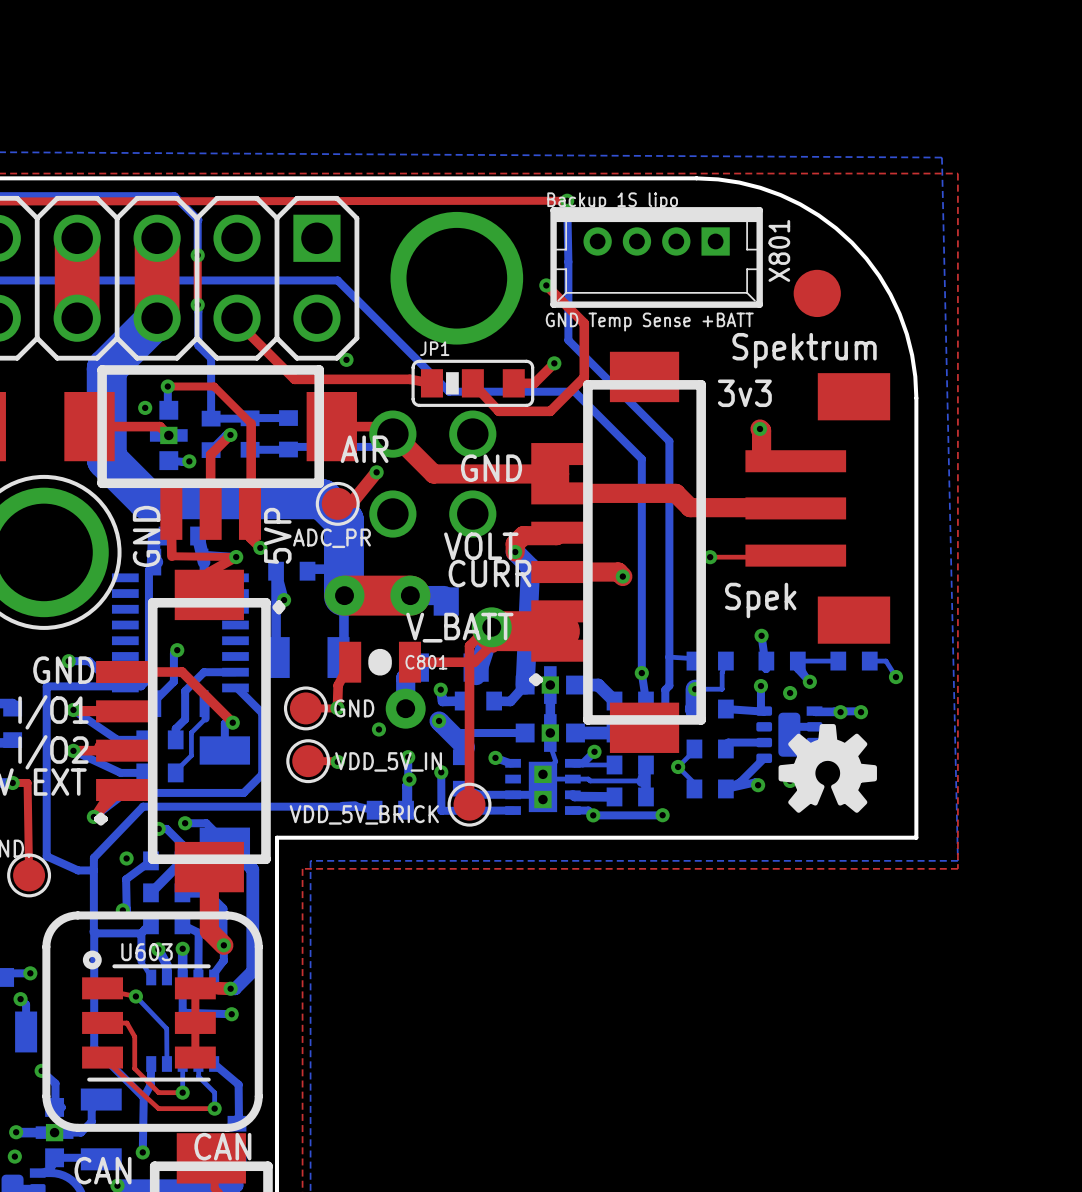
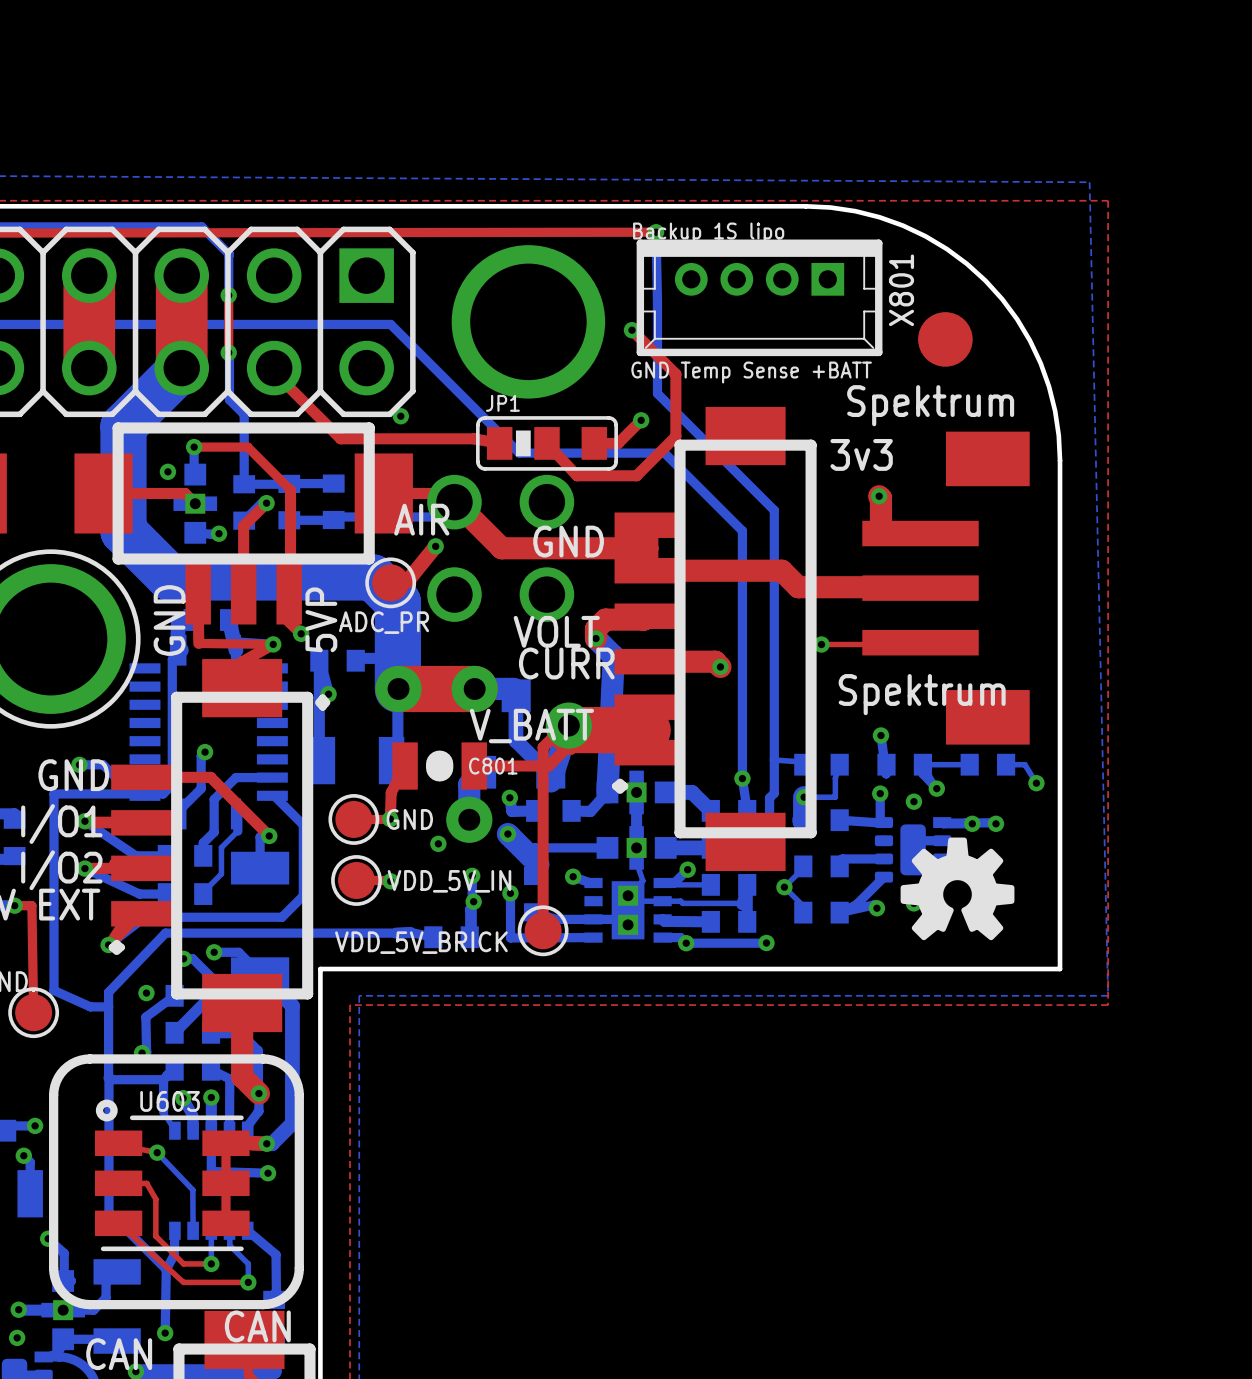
bottom track: none -> (515, 691) (515, 740) (547, 772)
text: Spek (760, 600) -> Spektrum (922, 694)

